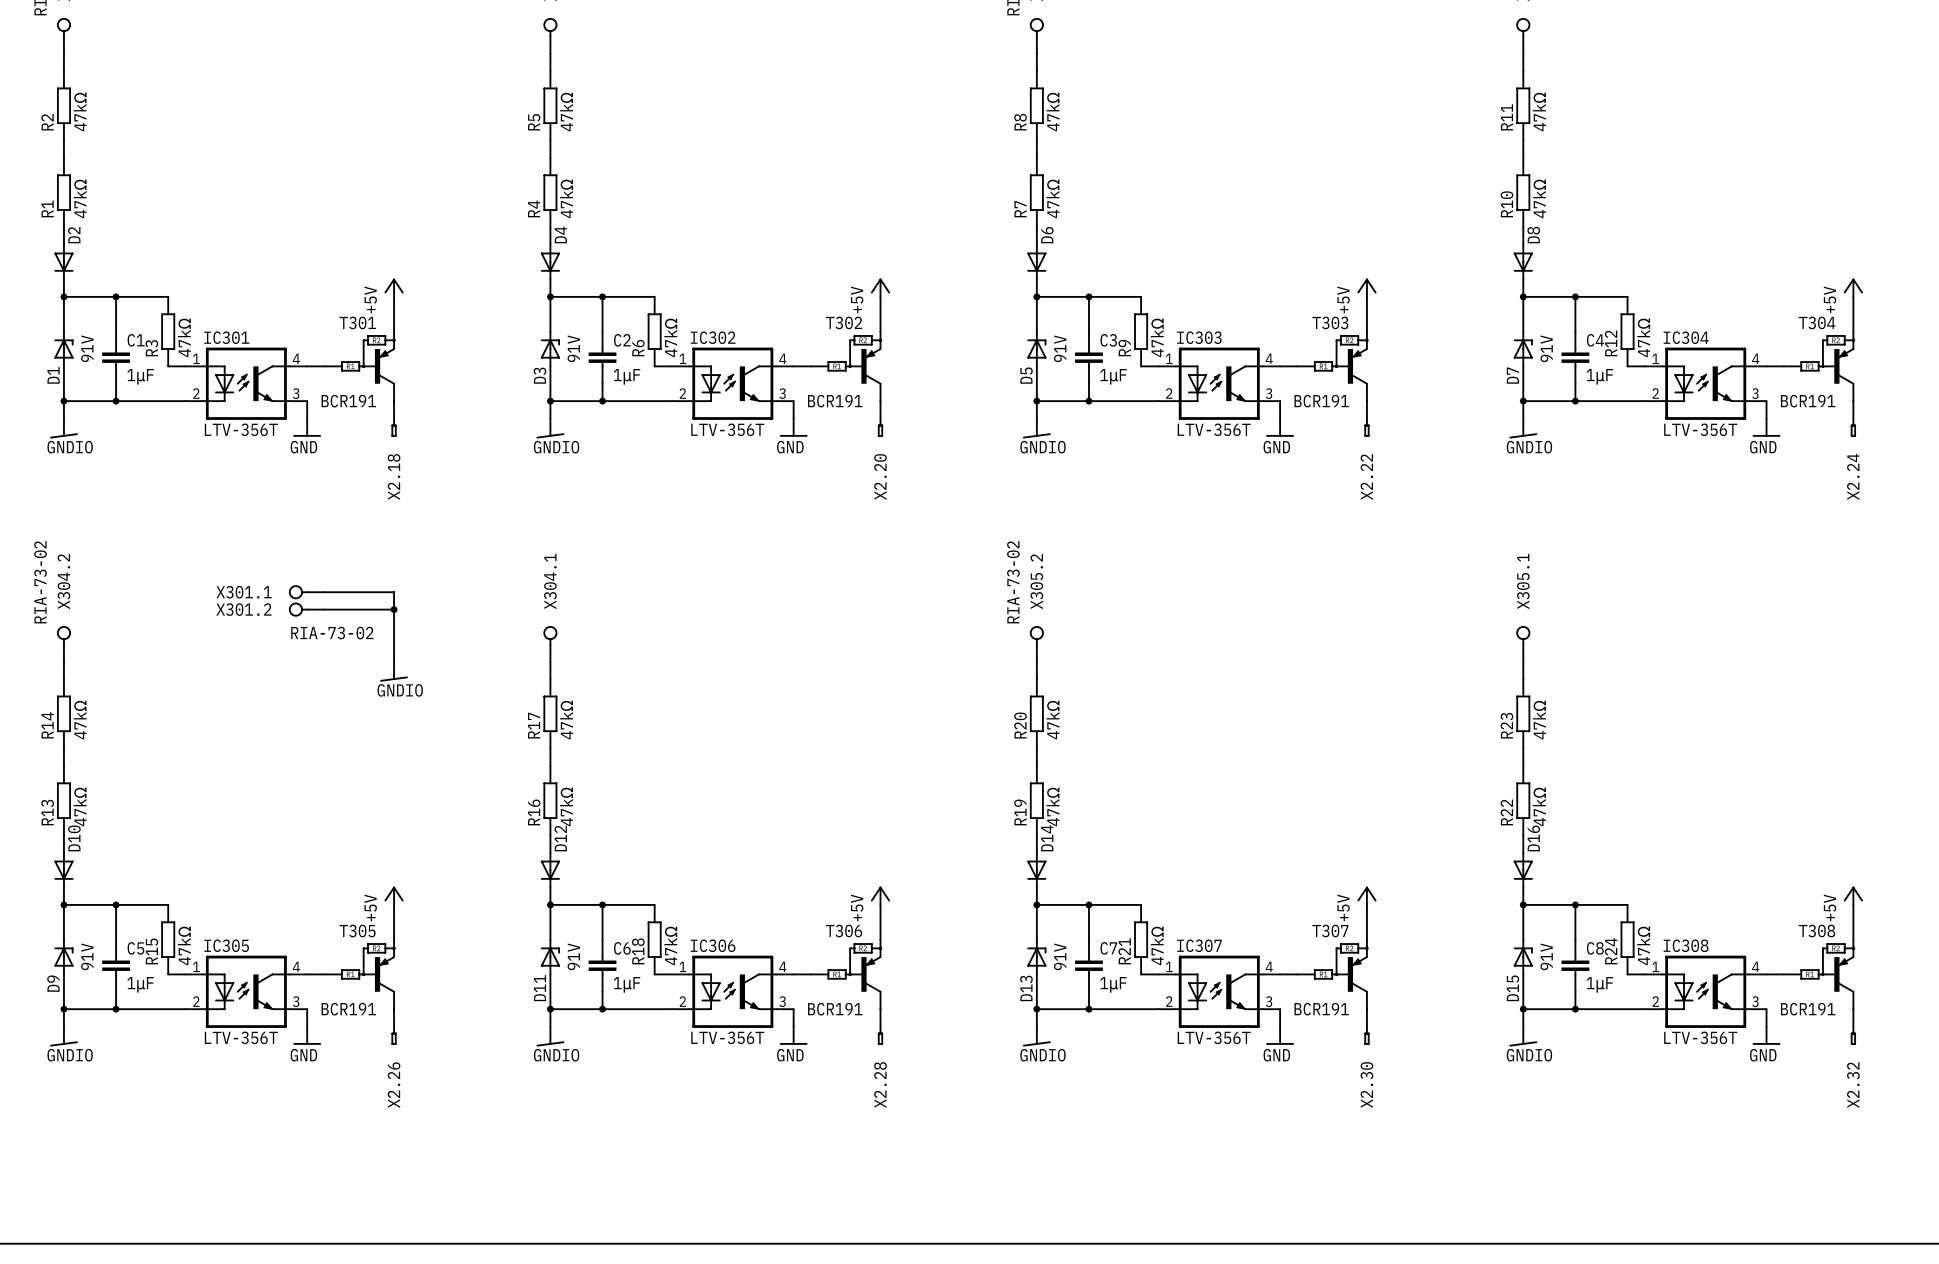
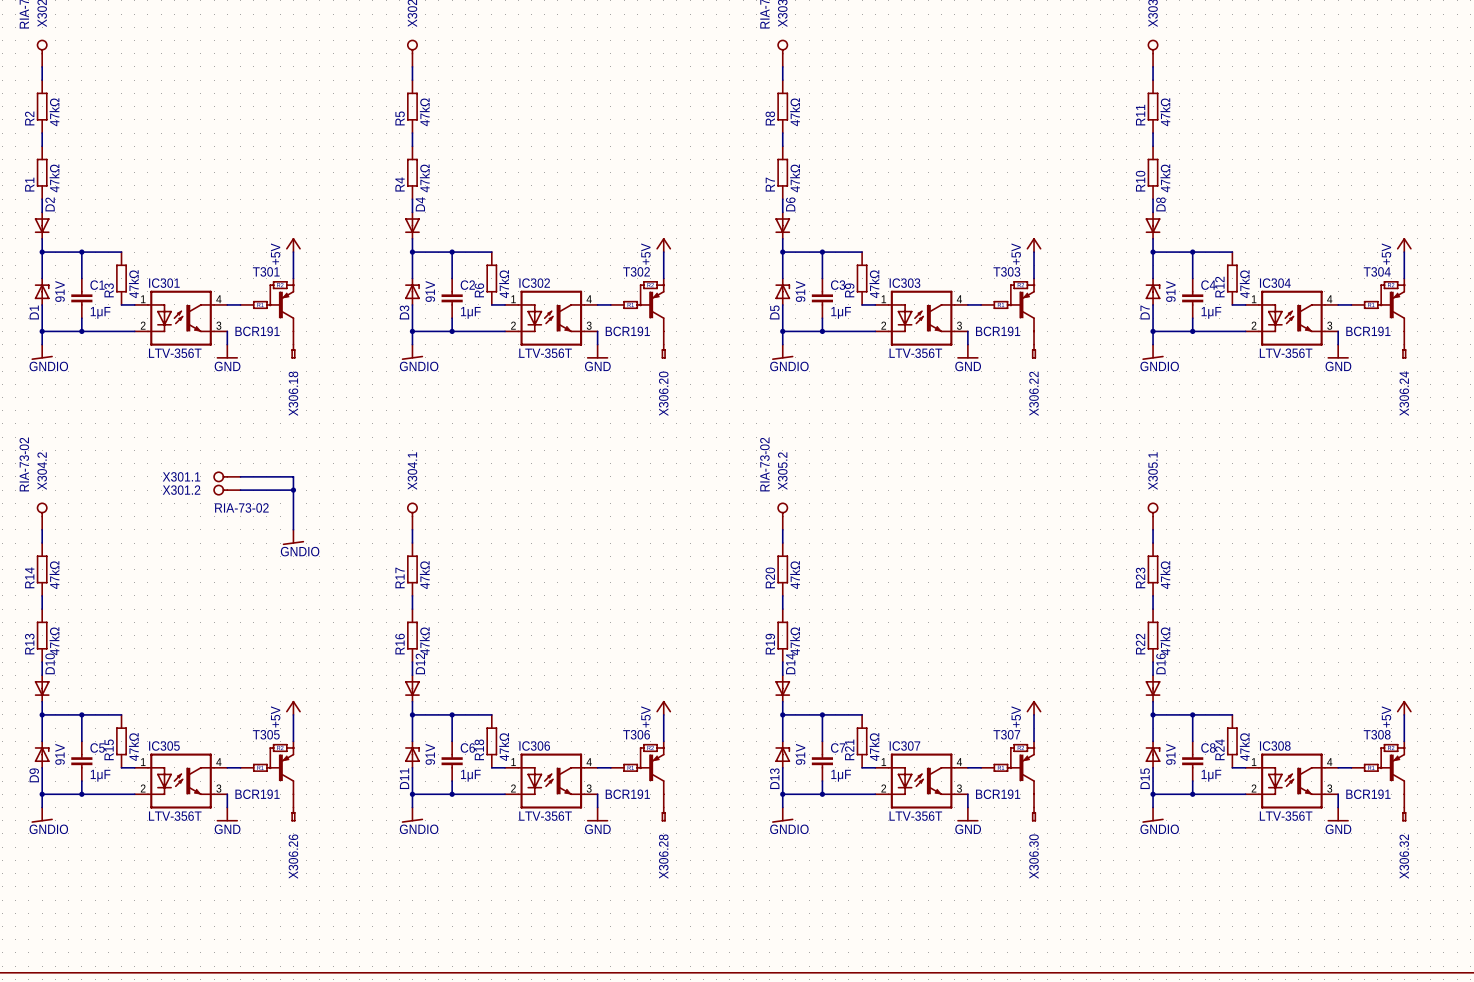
X2.18 name: X2.18 (394, 476) -> X306.18 (293, 393)
X2.24 name: X2.24 (1853, 476) -> X306.24 (1404, 393)
X2.20 name: X2.20 (880, 477) -> X306.20 (663, 393)
X2.22 name: X2.22 (1366, 477) -> X306.22 (1034, 393)
X2.26 name: X2.26 (394, 1085) -> X306.26 (293, 856)
X2.28 name: X2.28 (880, 1085) -> X306.28 (663, 856)
X2.30 name: X2.30 (1366, 1085) -> X306.30 (1034, 856)
X2.32 name: X2.32 (1853, 1085) -> X306.32 (1404, 856)

